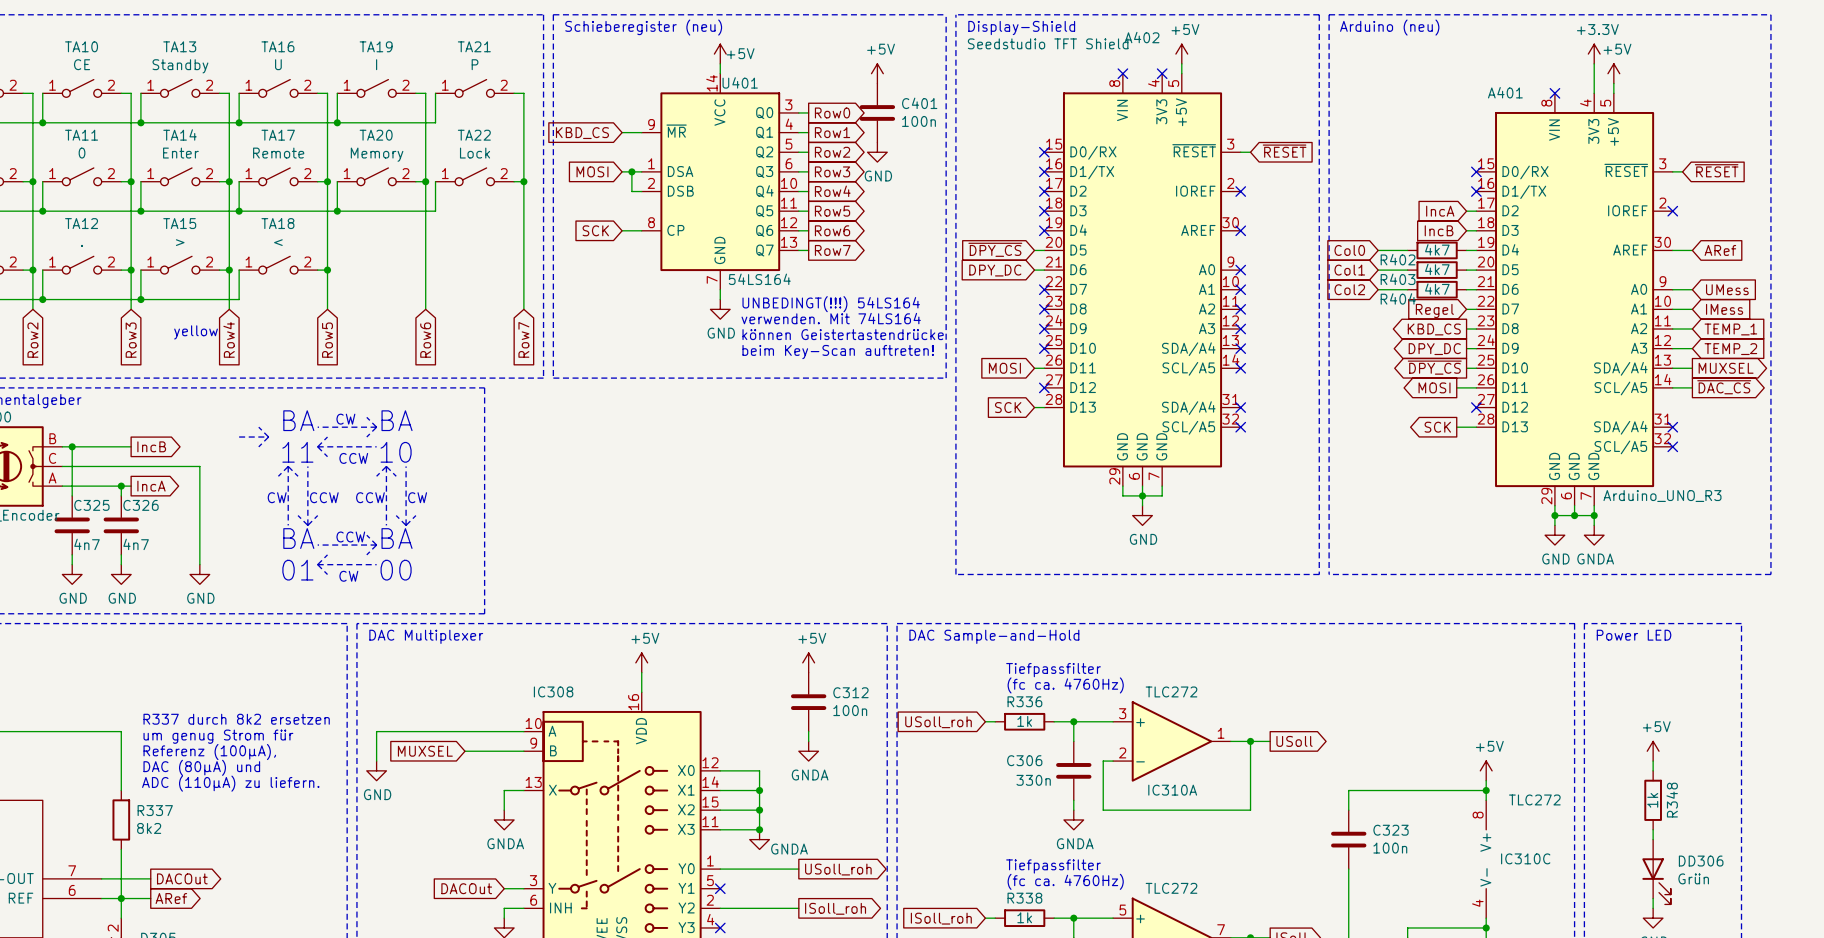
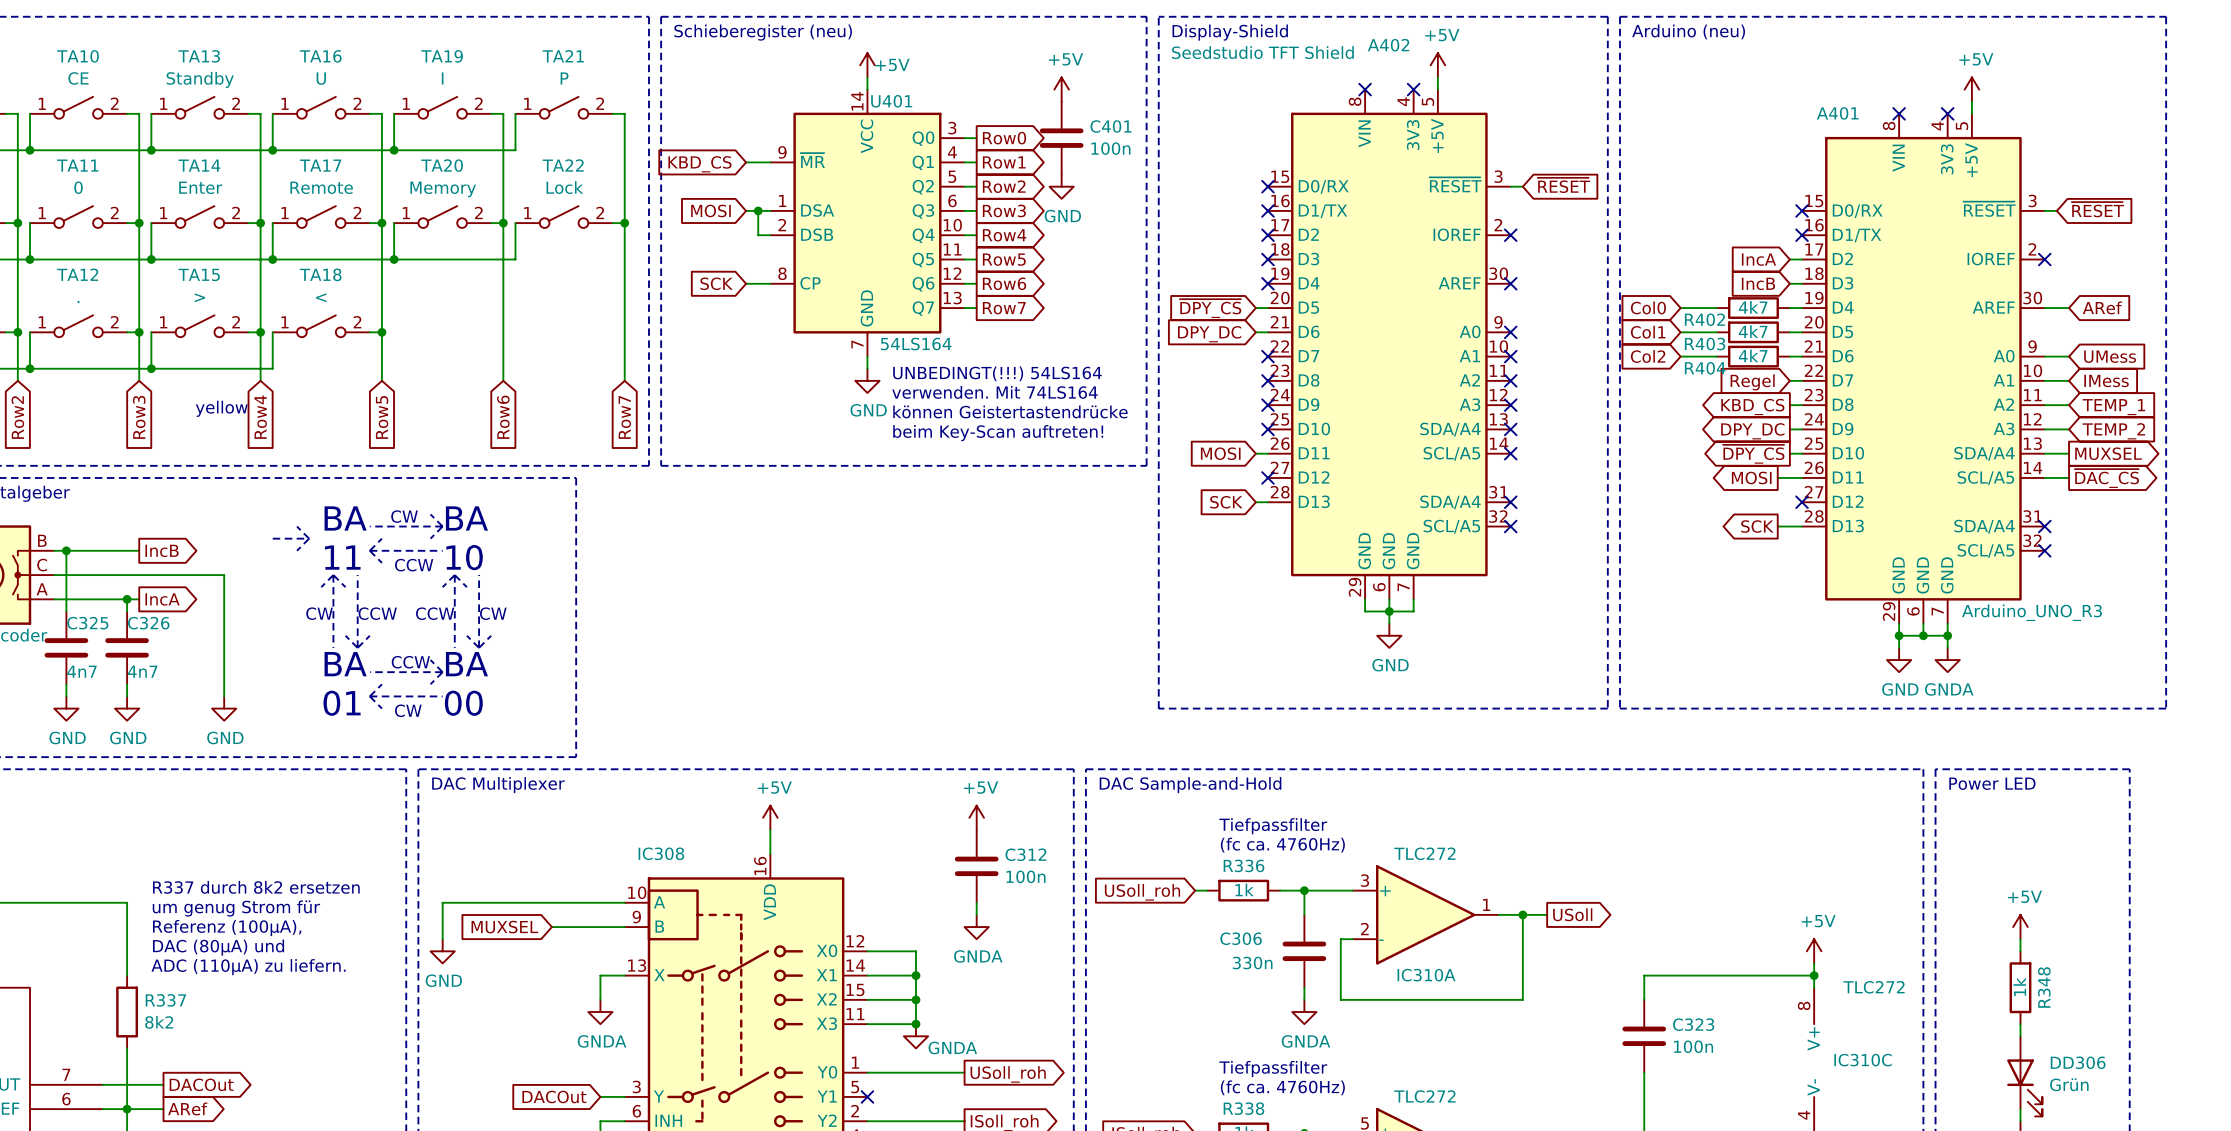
power symbol: +3.3V (1594, 54) -> none
wire: (1594, 63) (1594, 93) -> none
no-connect mark: none -> (1947, 113)

